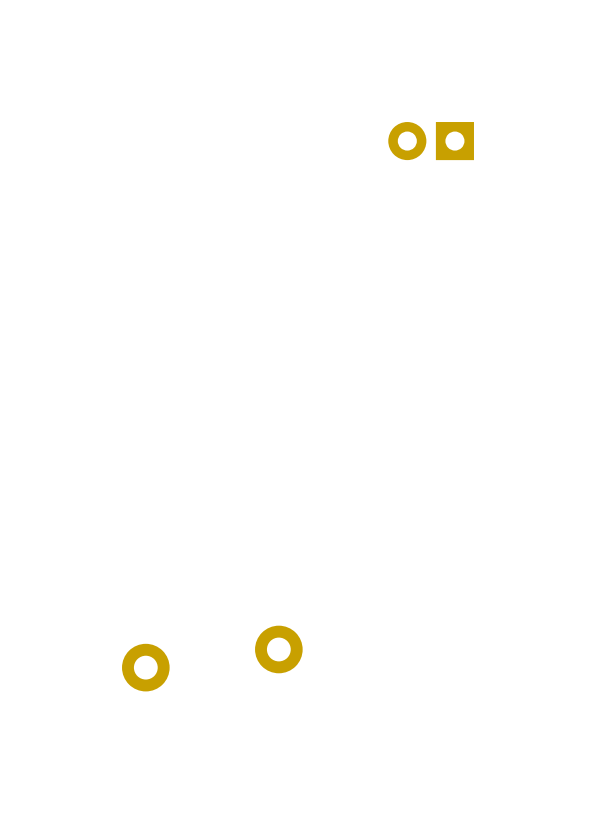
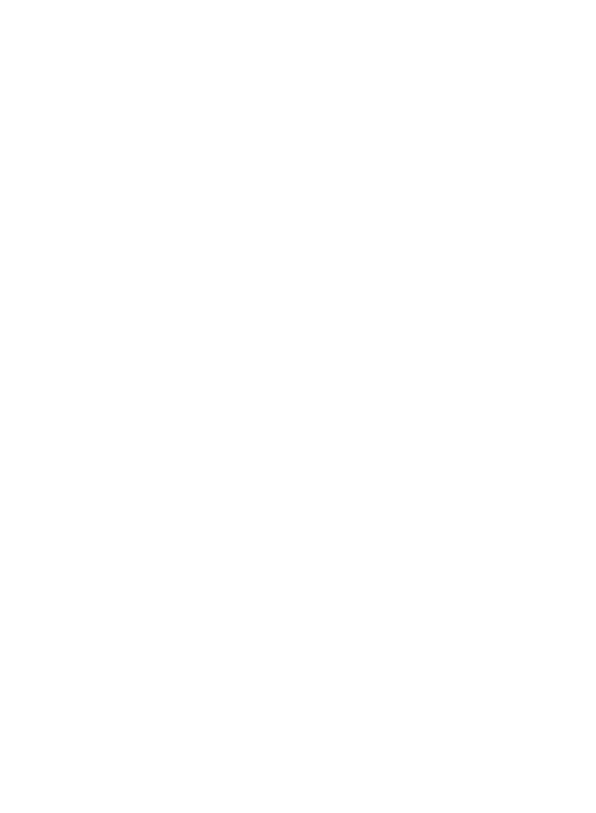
part: (431, 141) -> none
part: (278, 649) -> none
part: (145, 667) -> none

